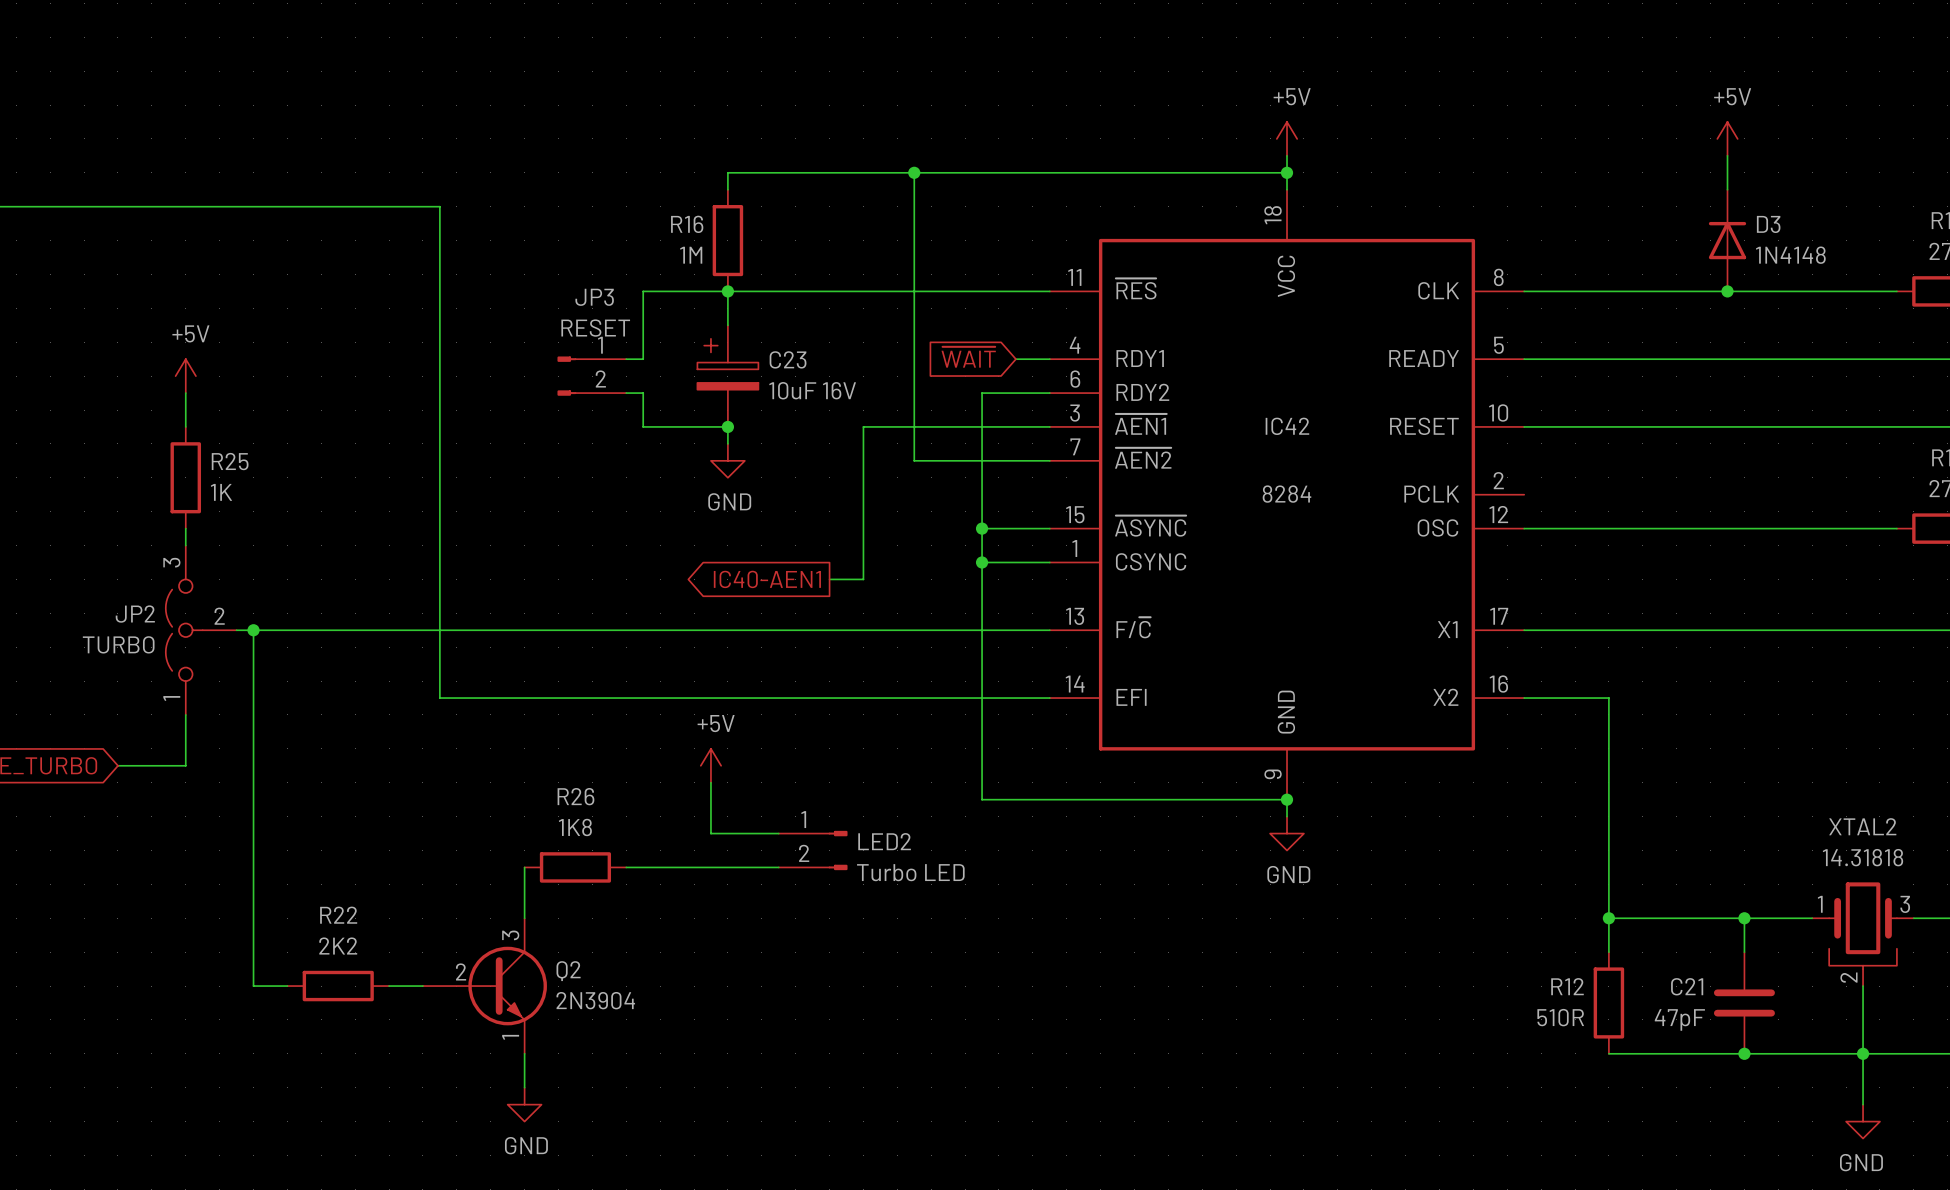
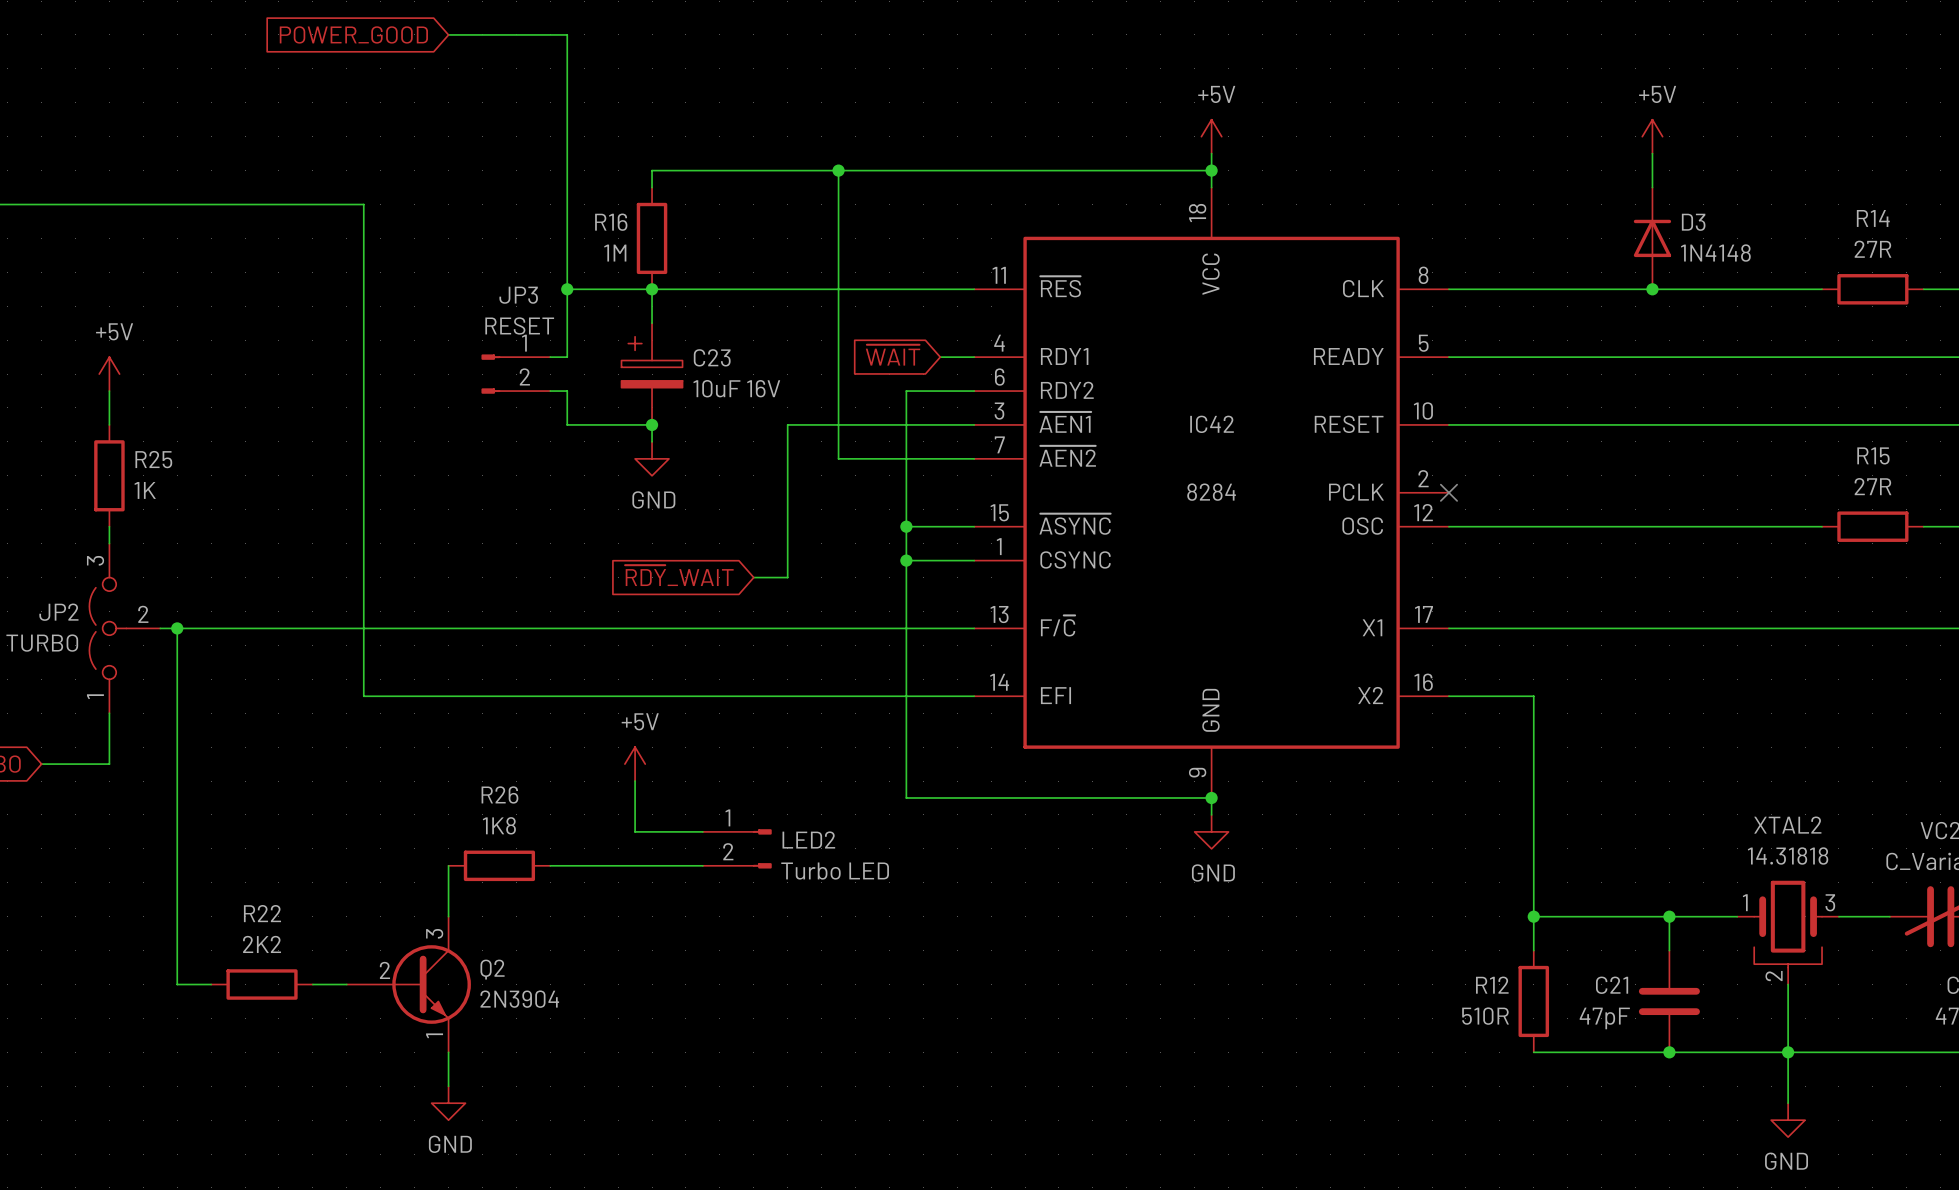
global label: none -> POWER_GOOD (353, 34)
wire: none -> (448, 34) (567, 34) (567, 289)
junction: none -> (567, 289)
no-connect mark: none -> (1448, 492)
global label shape: output (767, 579) -> input (679, 575)
global label: IC40-AEN1 (767, 579) -> ~{RDY}_WAIT (679, 575)

